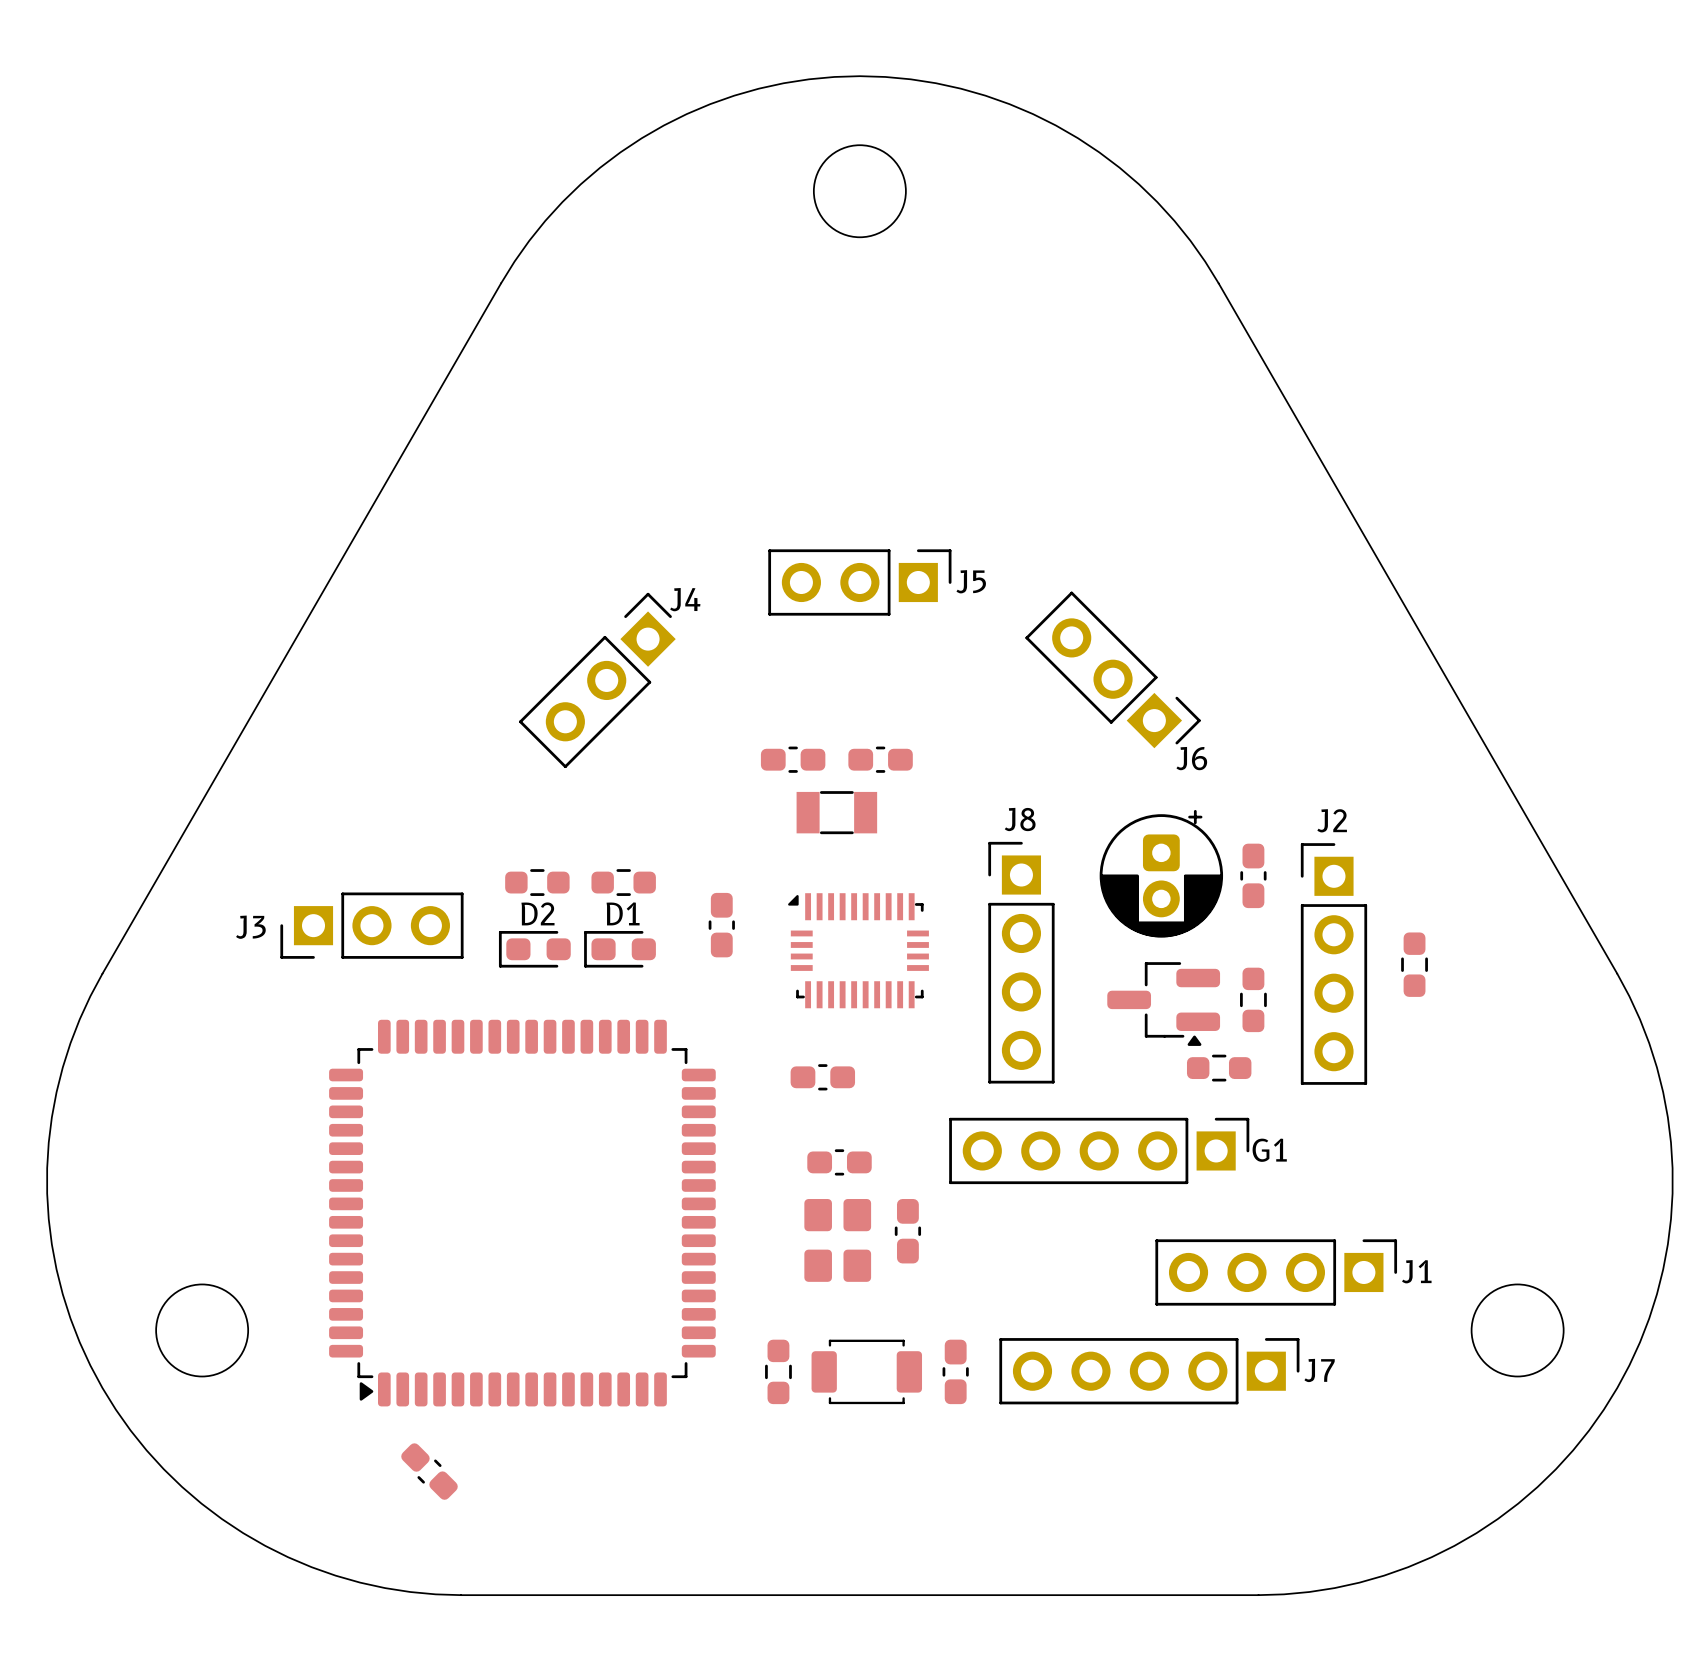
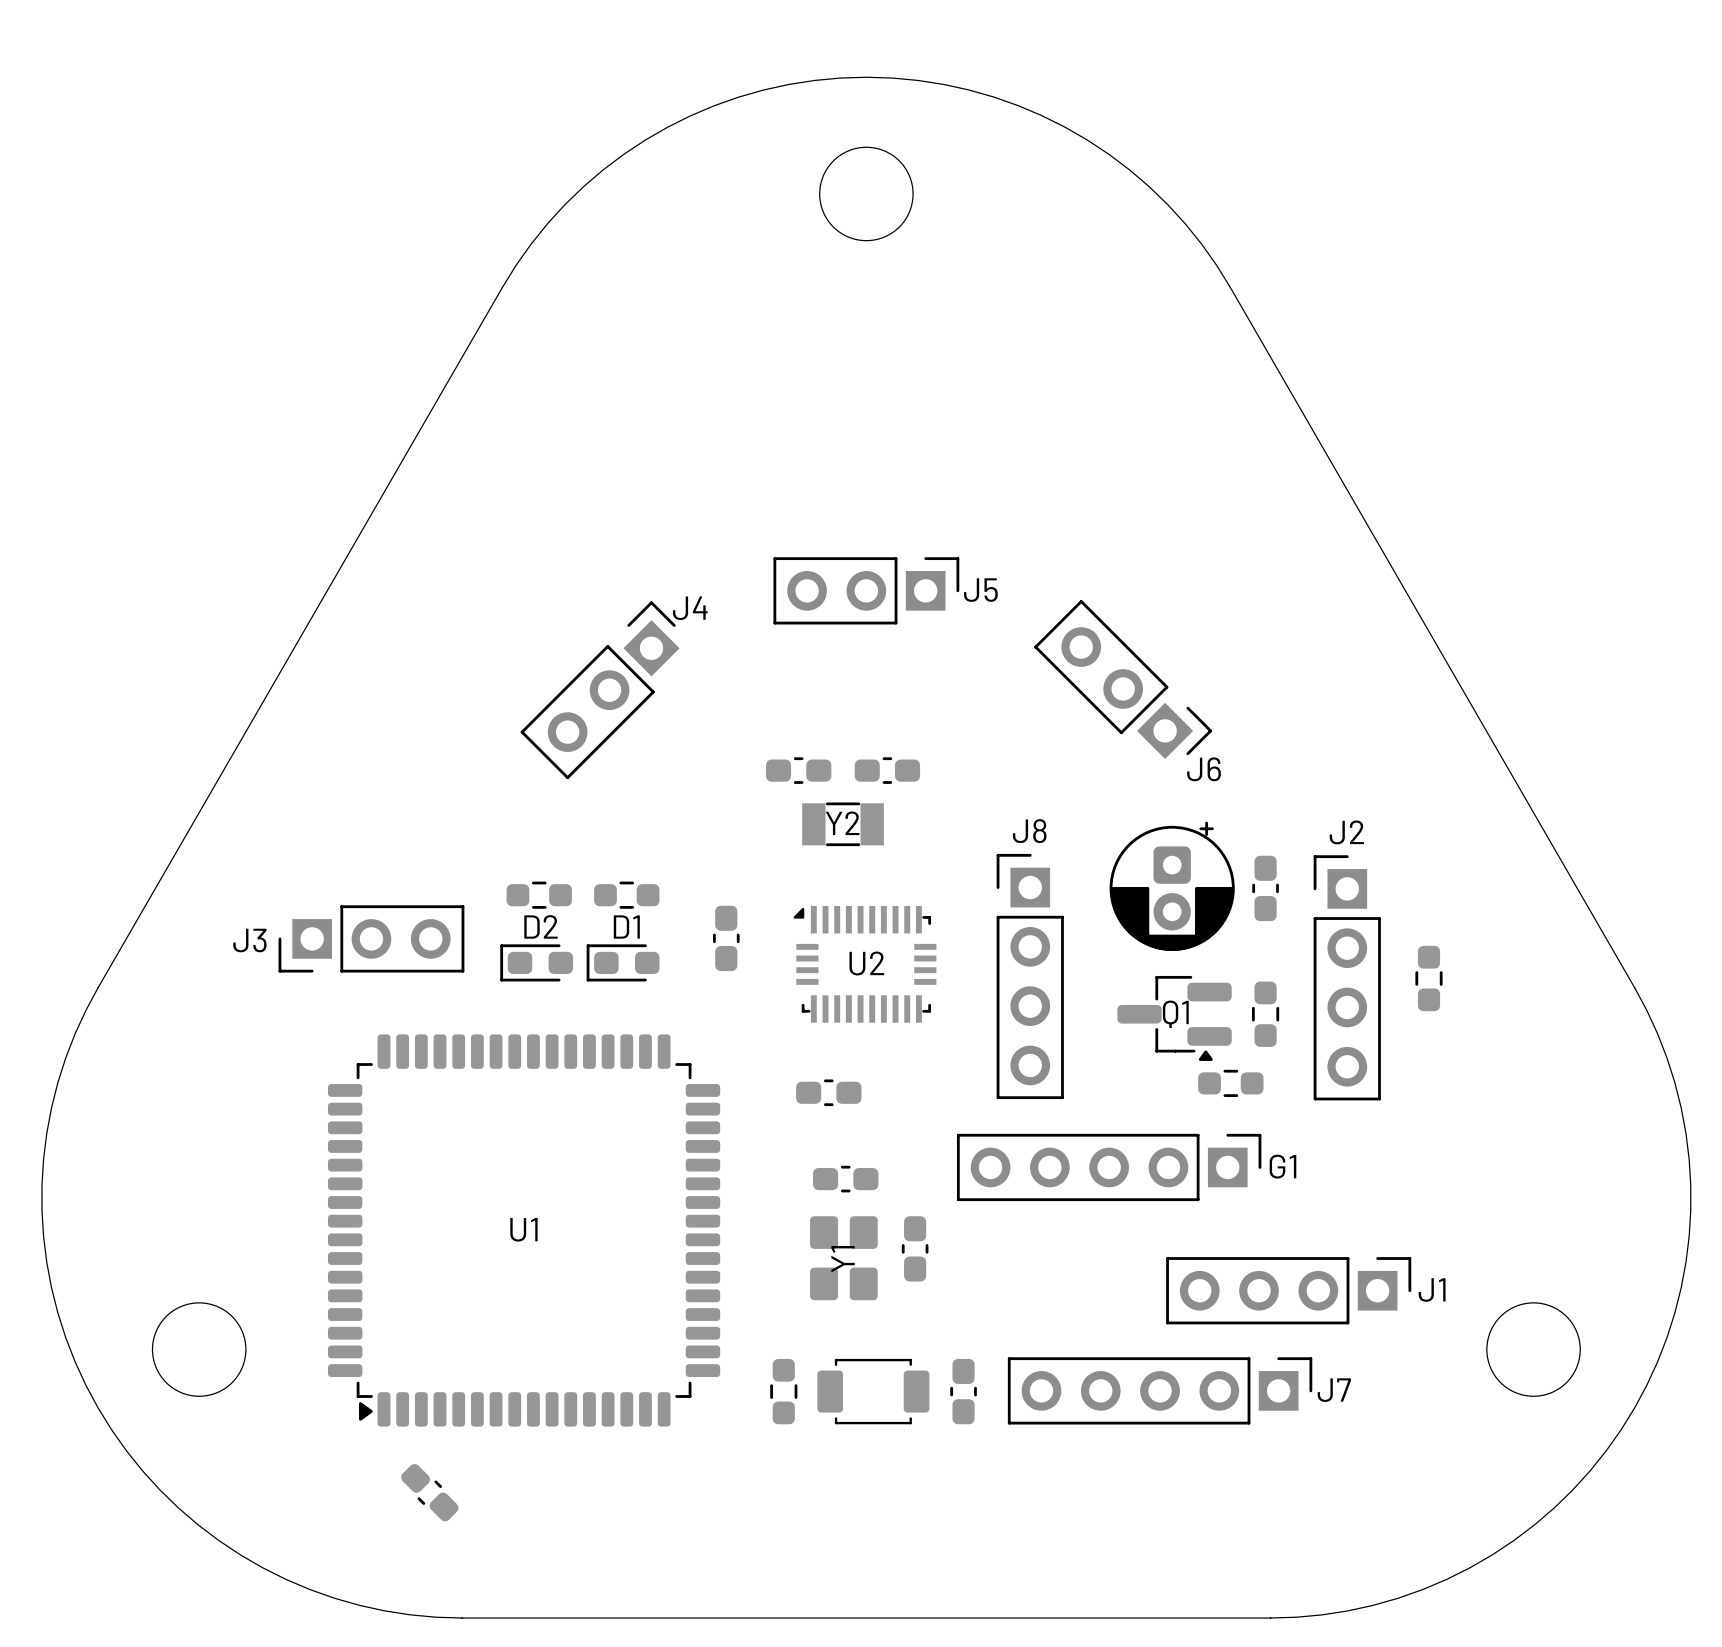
Y2 name: none -> Y2 (842, 823)
U2 name: none -> U2 (866, 963)
Q1 name: none -> Q1 (1175, 1014)
U1 name: none -> U1 (523, 1229)
Y1 name: none -> Y1 (843, 1259)

